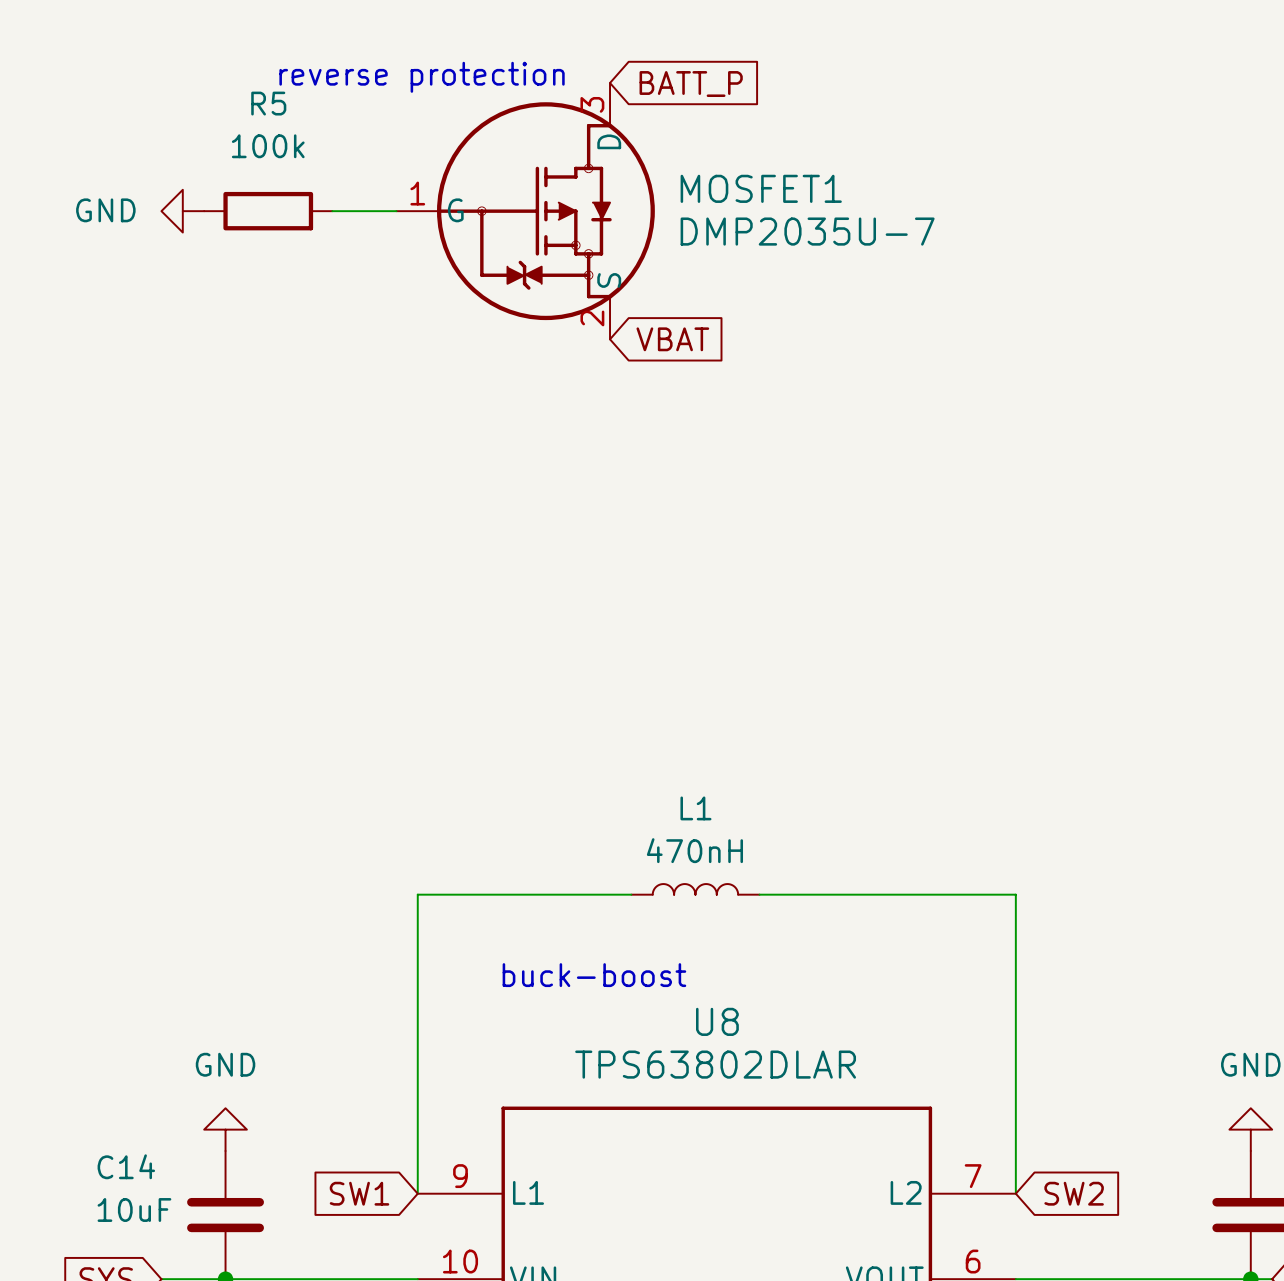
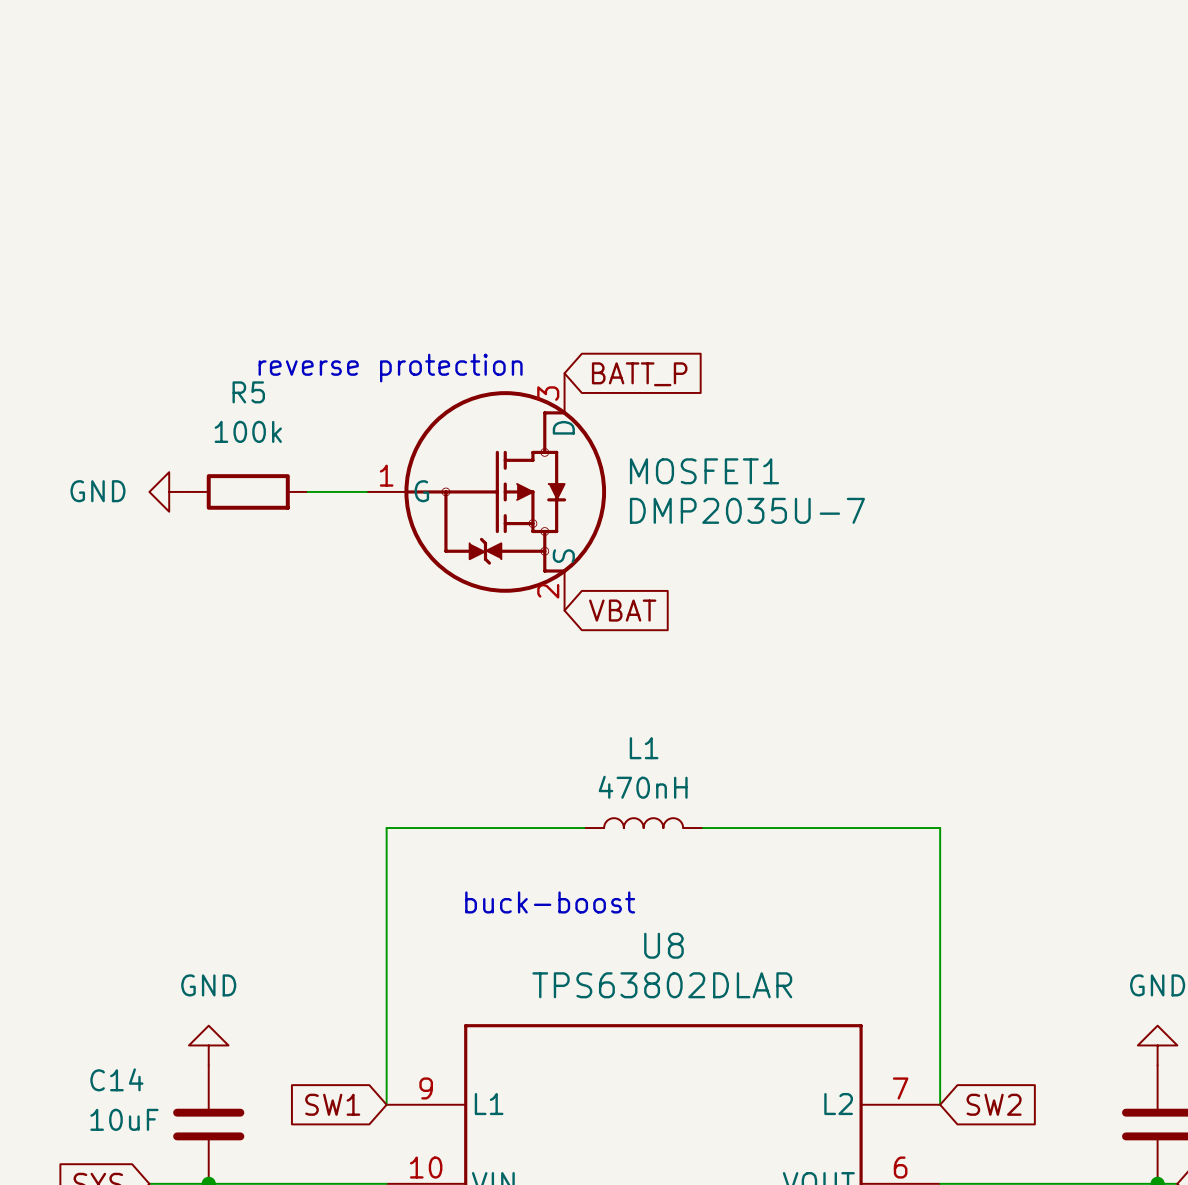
text position: reverse protection (422, 77) -> reverse protection (390, 368)
global label position: BATT_P (691, 84) -> BATT_P (639, 374)
power symbol position: GND (182, 211) -> GND (169, 491)
R5 position: (268, 211) -> (248, 491)
wire: (332, 211) (396, 211) -> (307, 491) (366, 491)
MOSFET1 position: (525, 211) -> (486, 491)
global label position: VBAT (672, 339) -> VBAT (622, 610)

